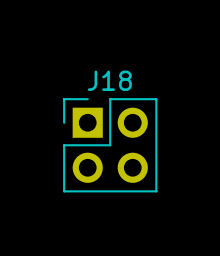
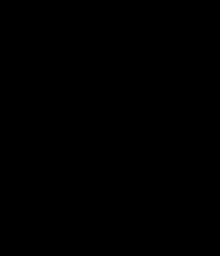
J18: (110, 145) -> none

